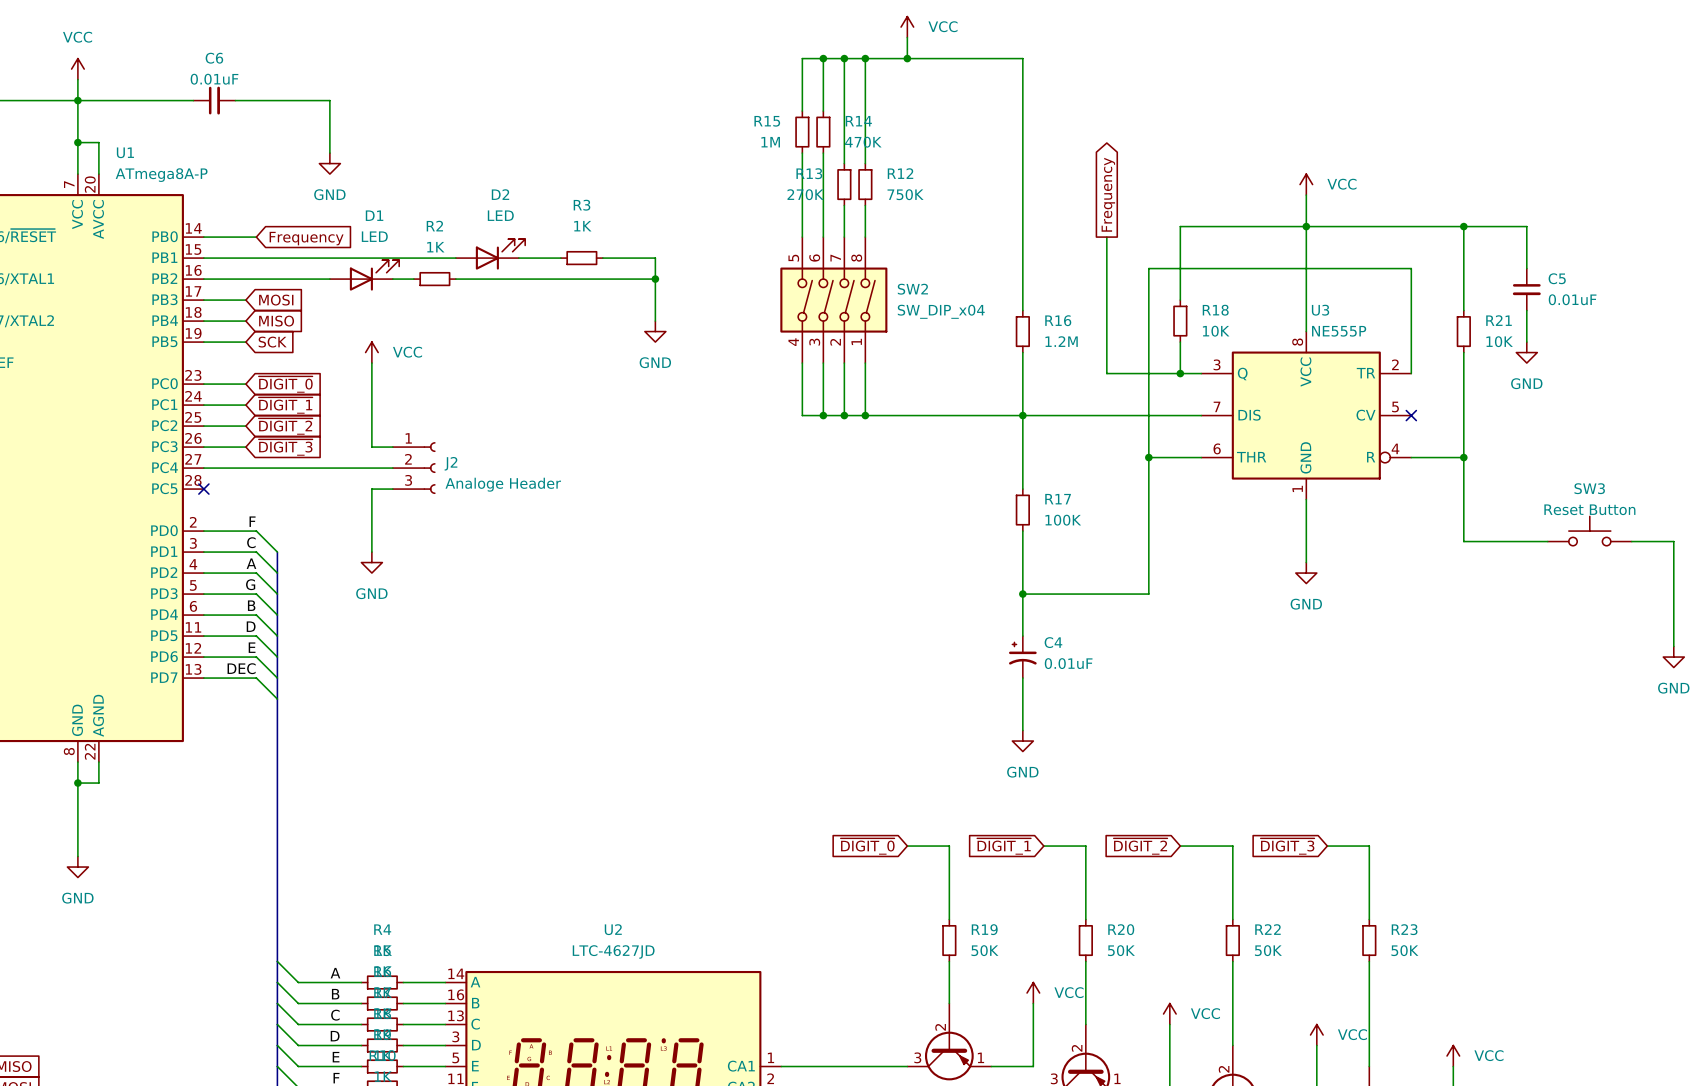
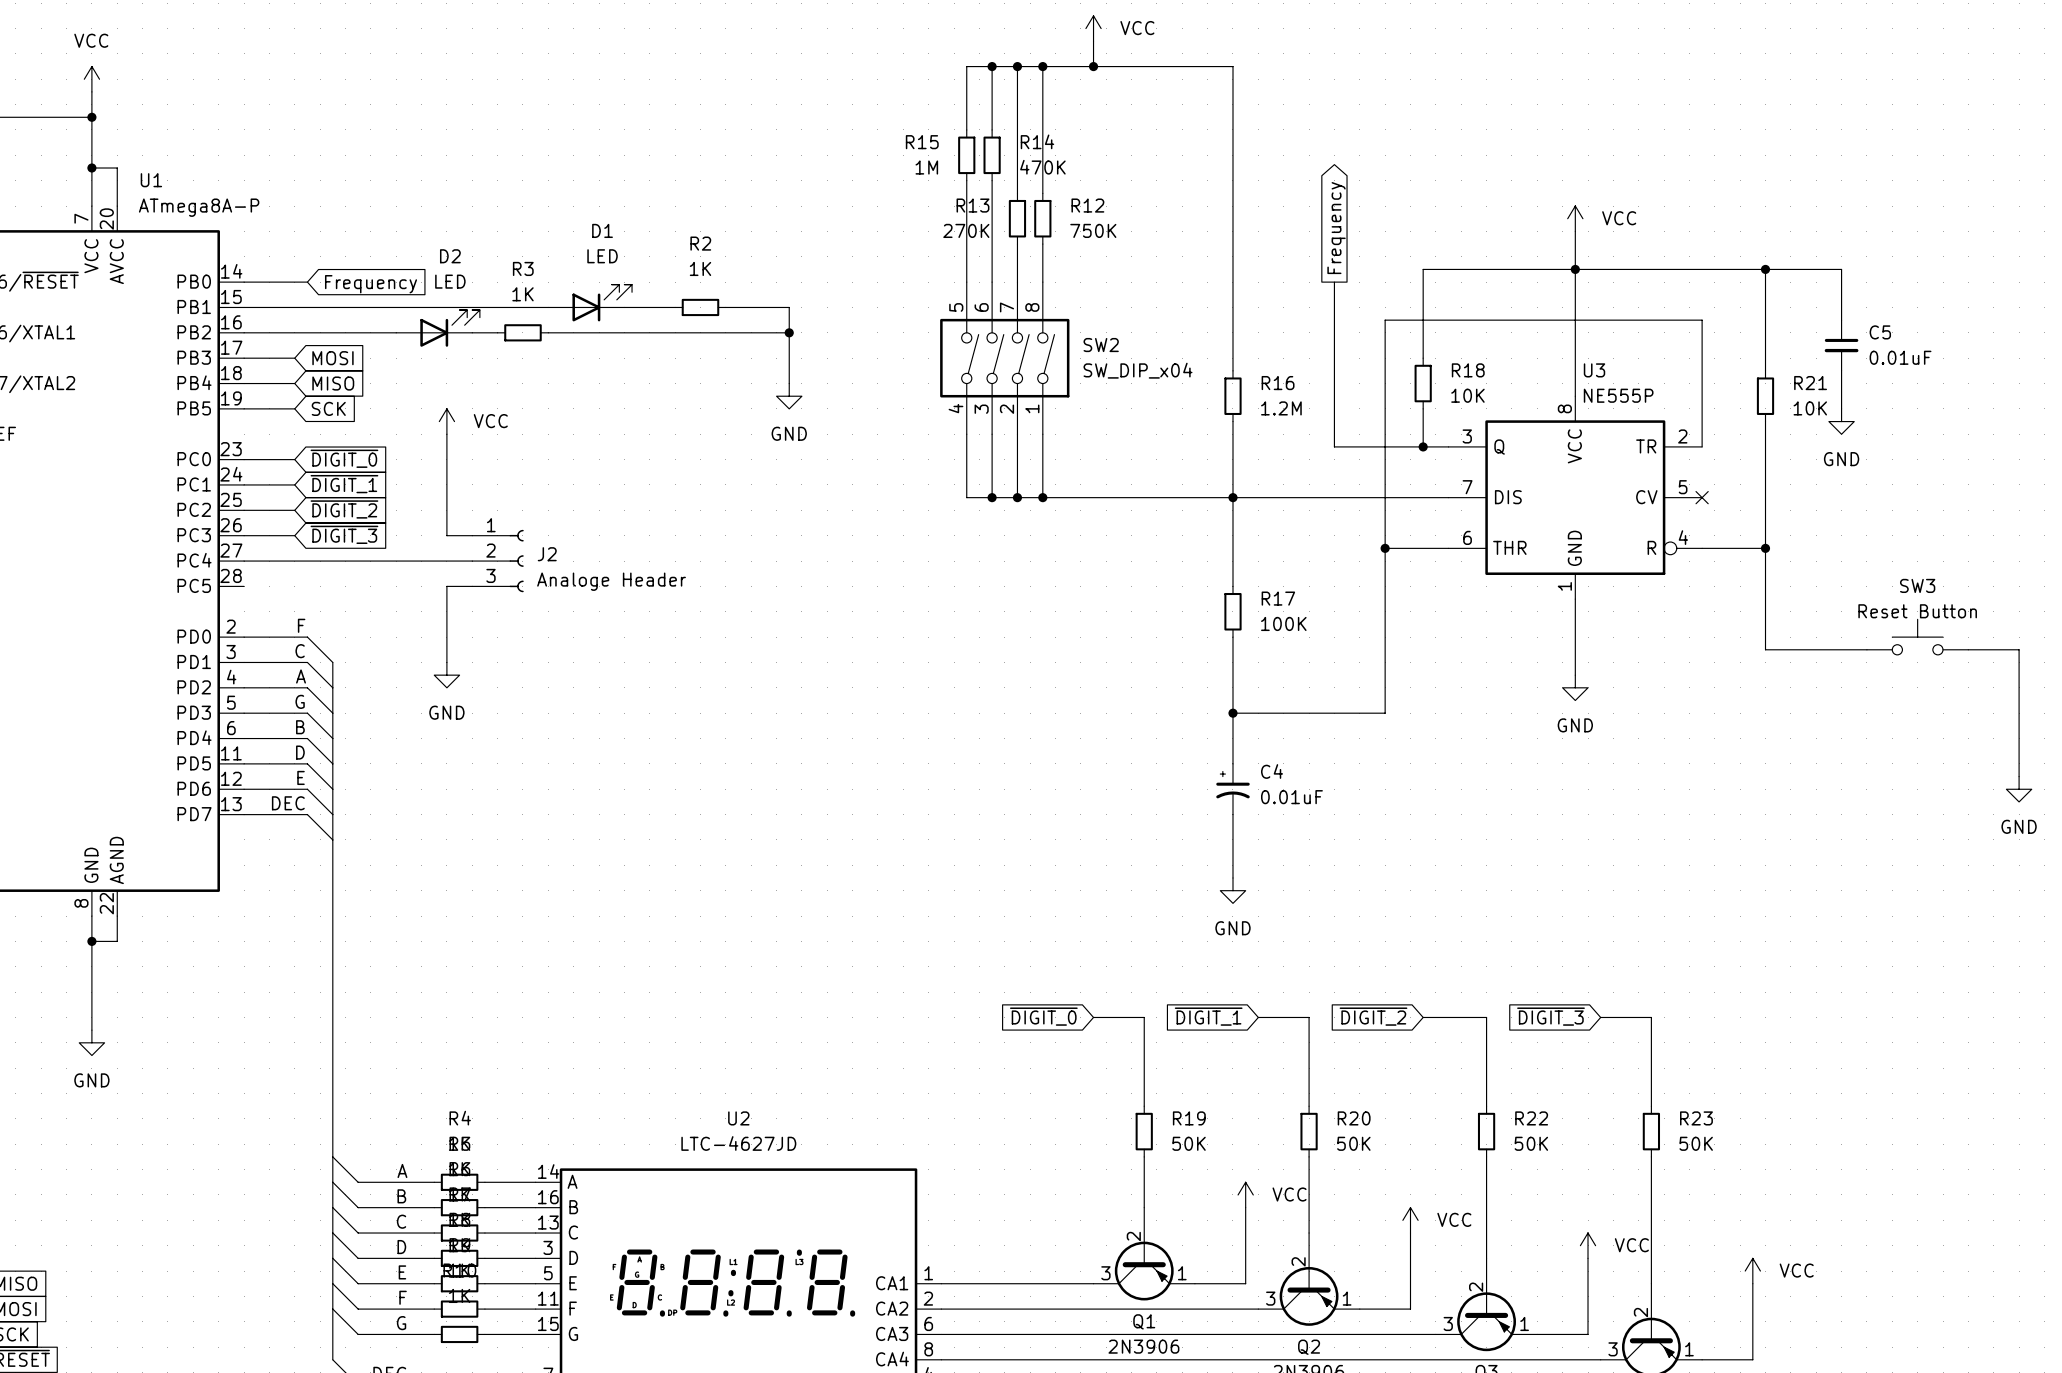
wire: (77, 100) (193, 100) -> none
C6: 0.01uF (214, 100) -> none
wire: (235, 100) (329, 100) (329, 153) -> none
power symbol: GND (329, 163) -> none
D2 name: D2 (500, 194) -> D1 (602, 230)
R3 name: R3 (582, 205) -> R2 (700, 243)
D1 name: D1 (374, 215) -> D2 (450, 256)
R2 name: R2 (434, 226) -> R3 (523, 268)
no-connect mark: (203, 489) -> none

